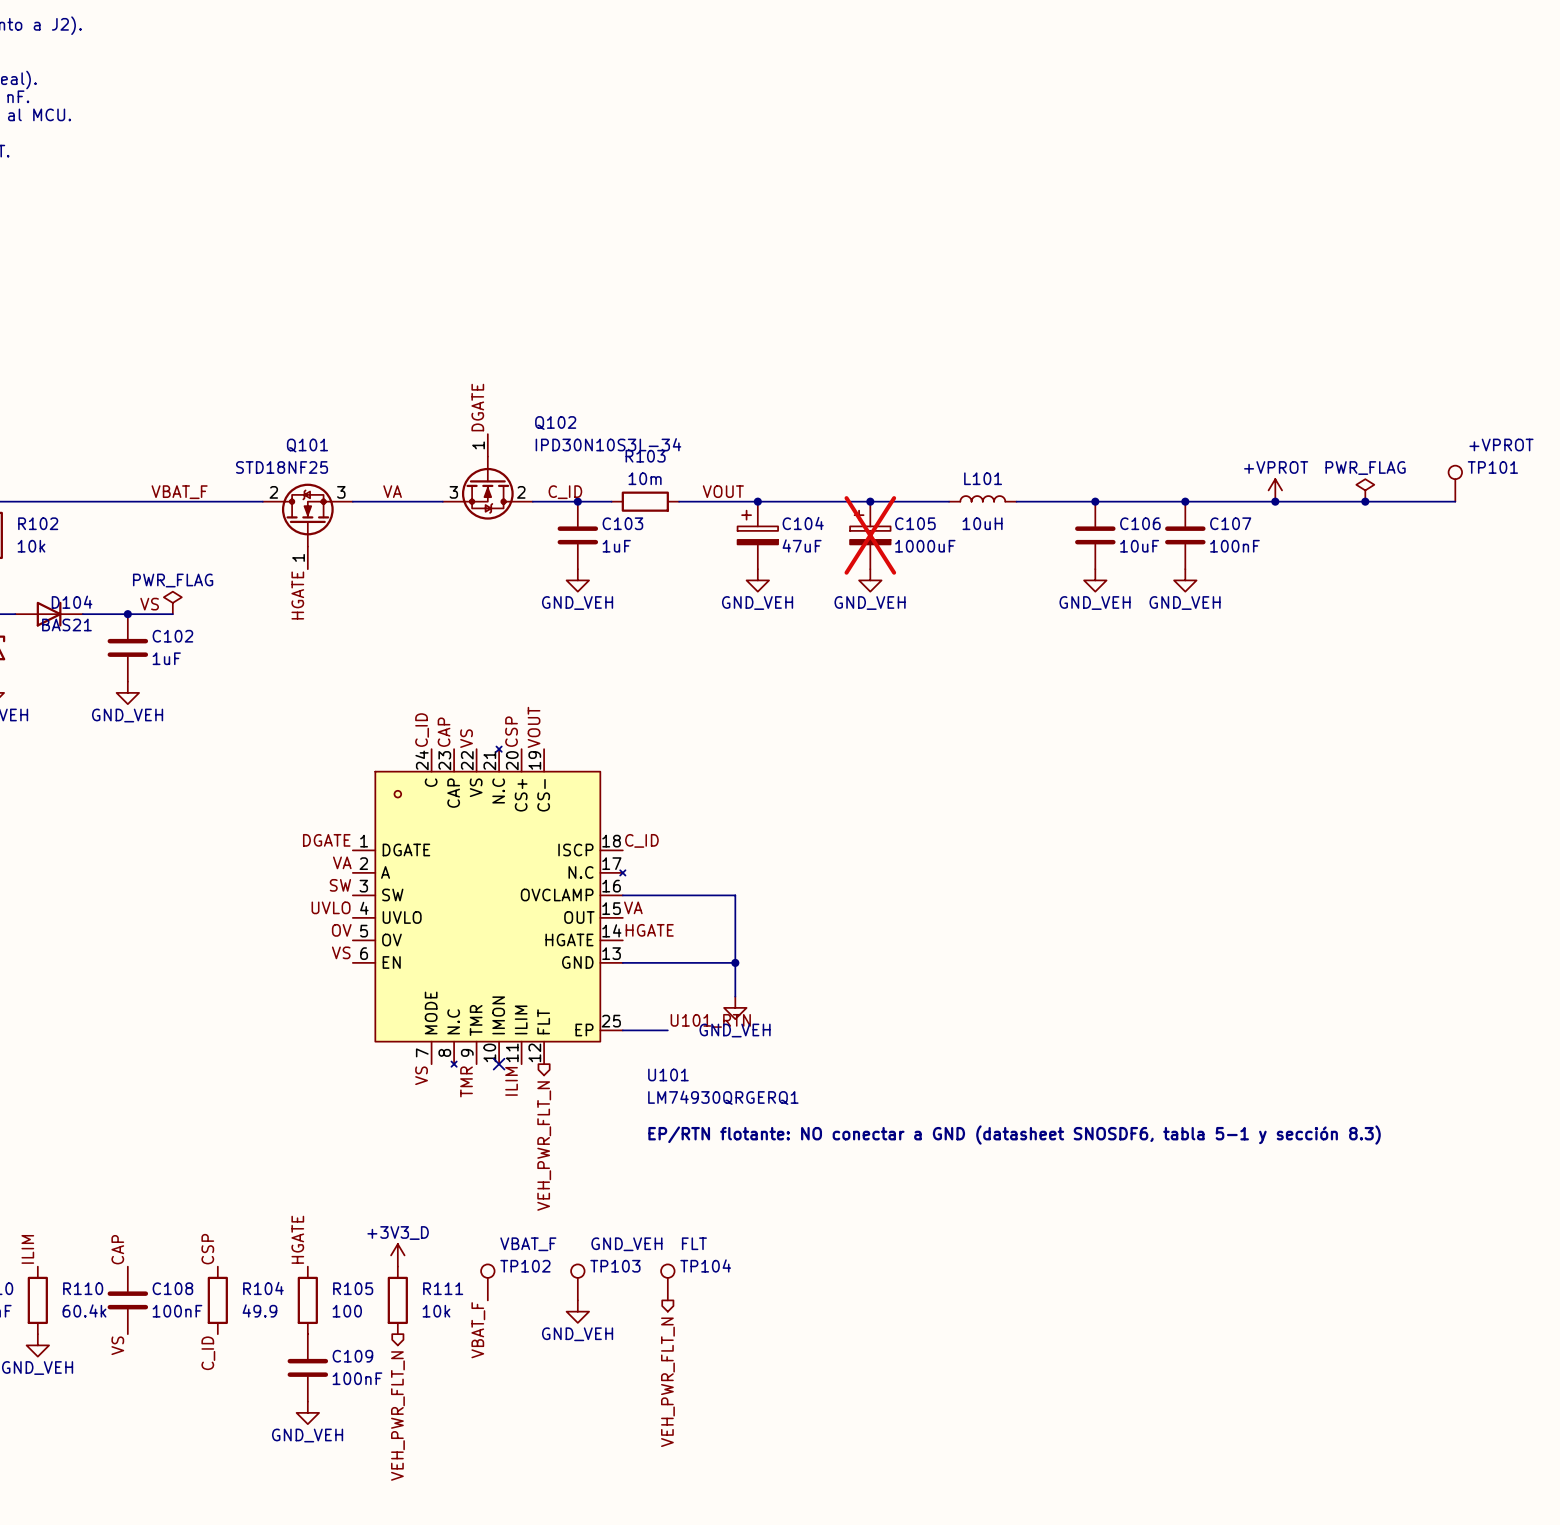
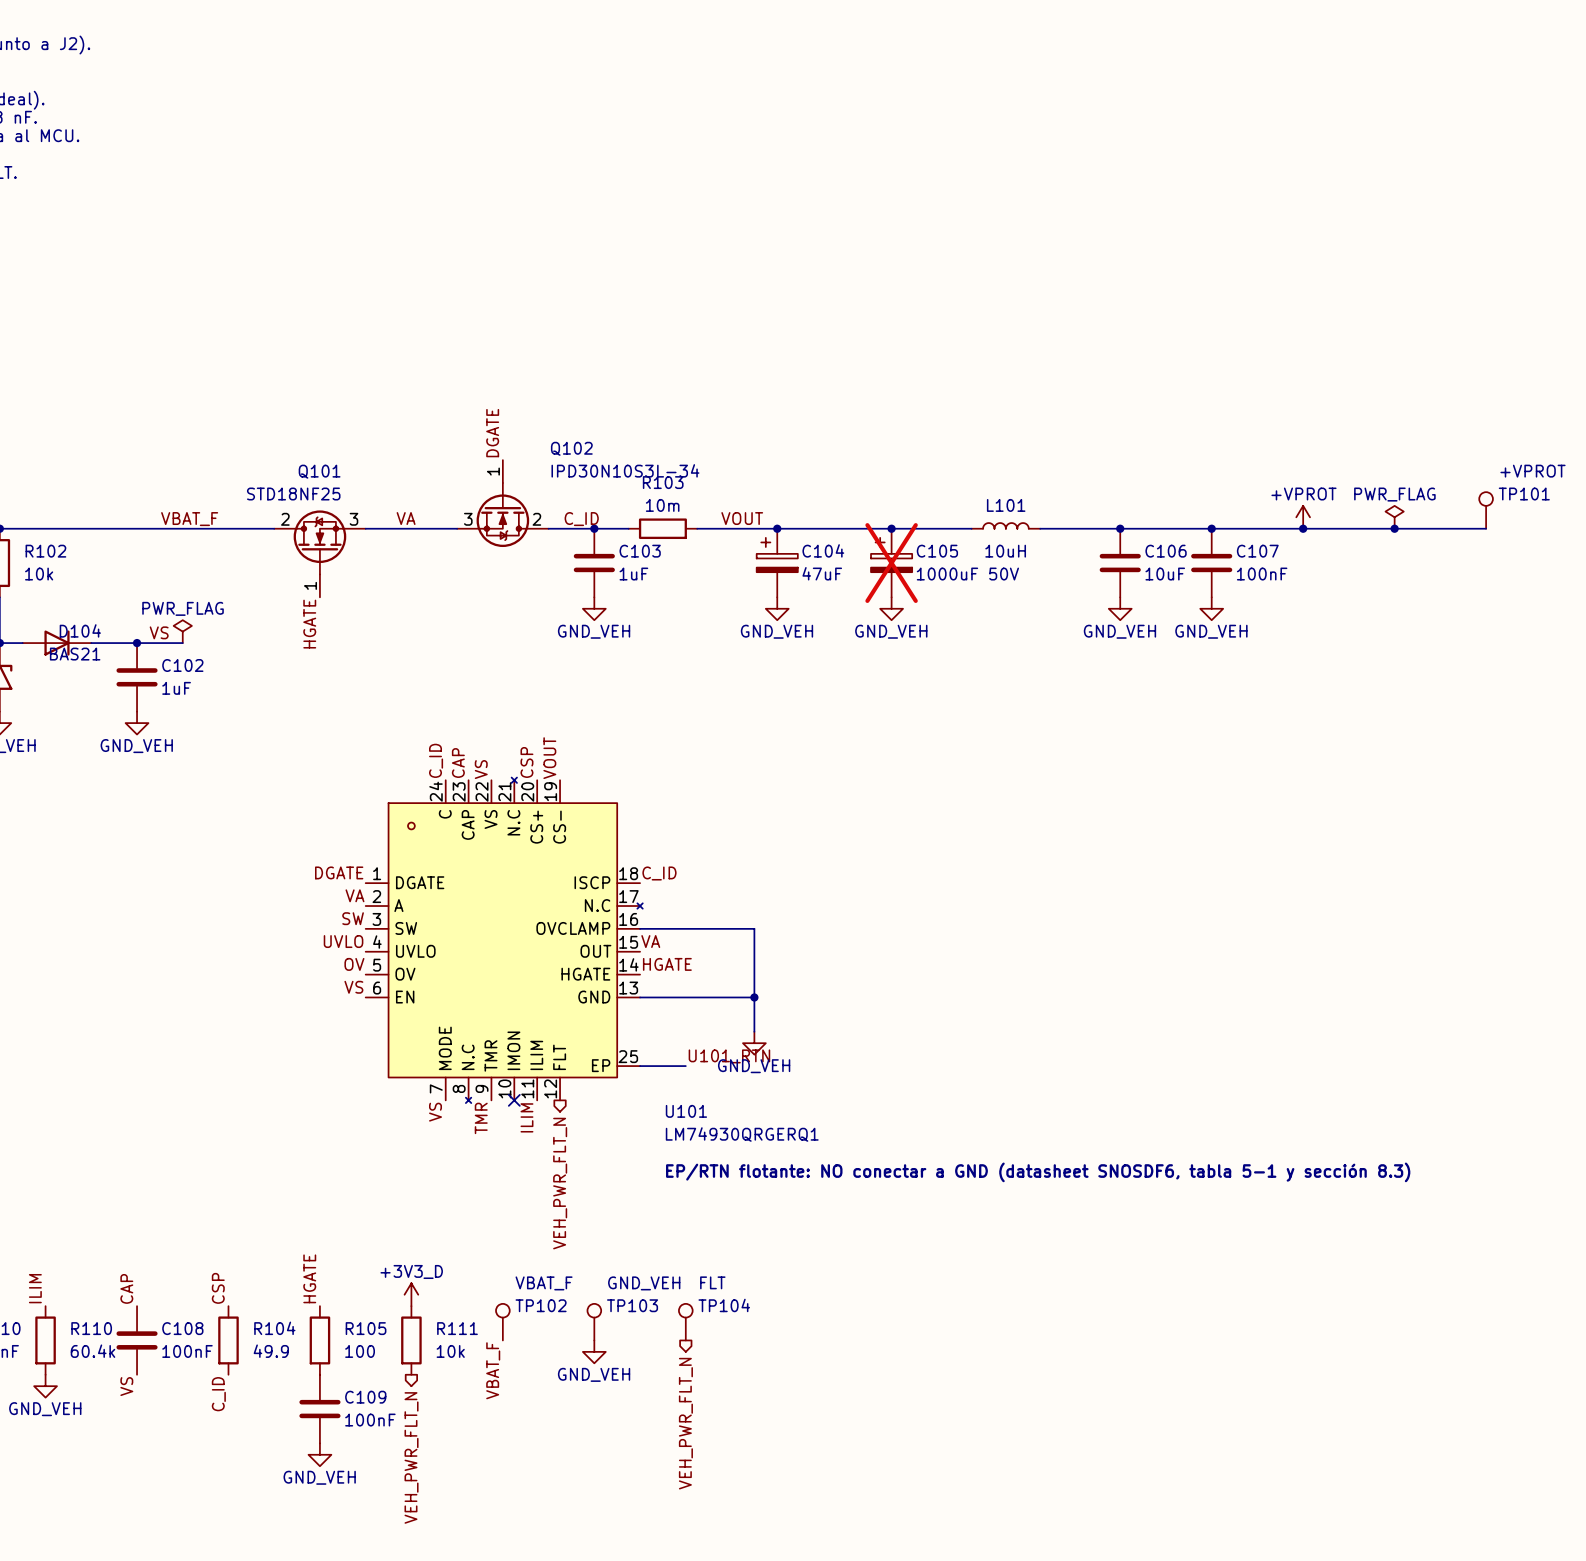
C105 value: 1000uF (925, 546) -> 1000uF 50V (967, 574)

